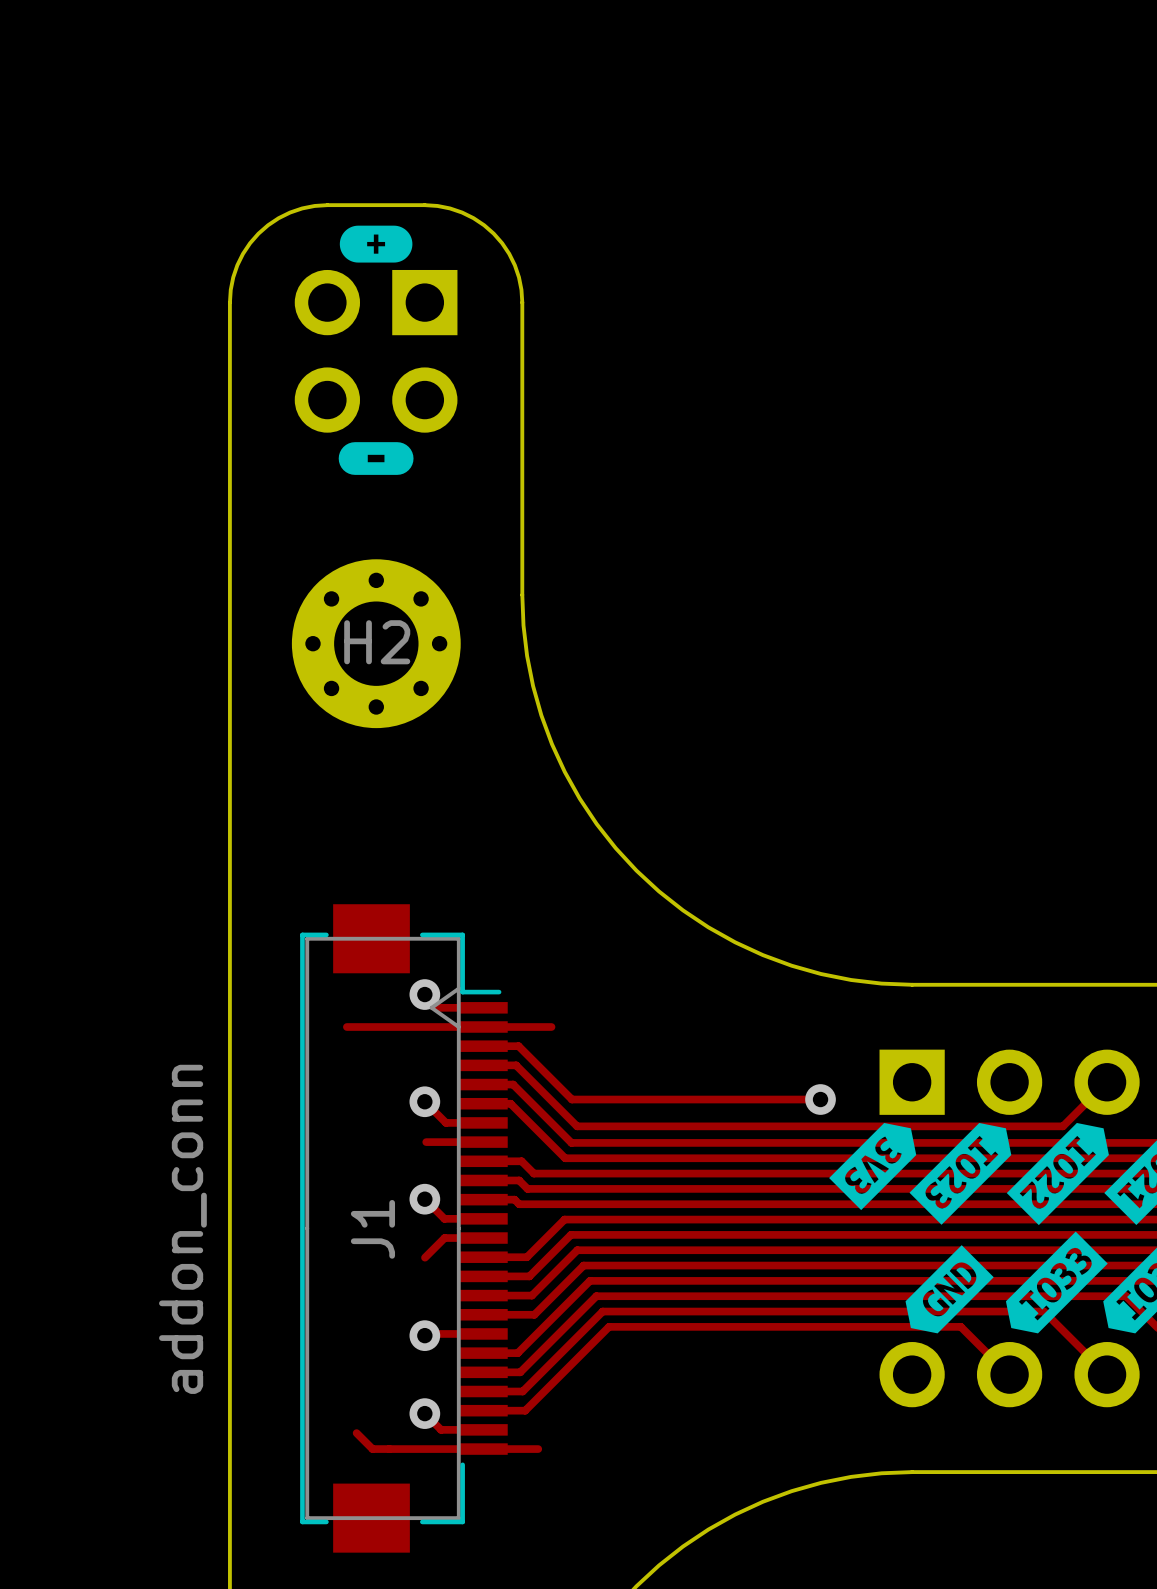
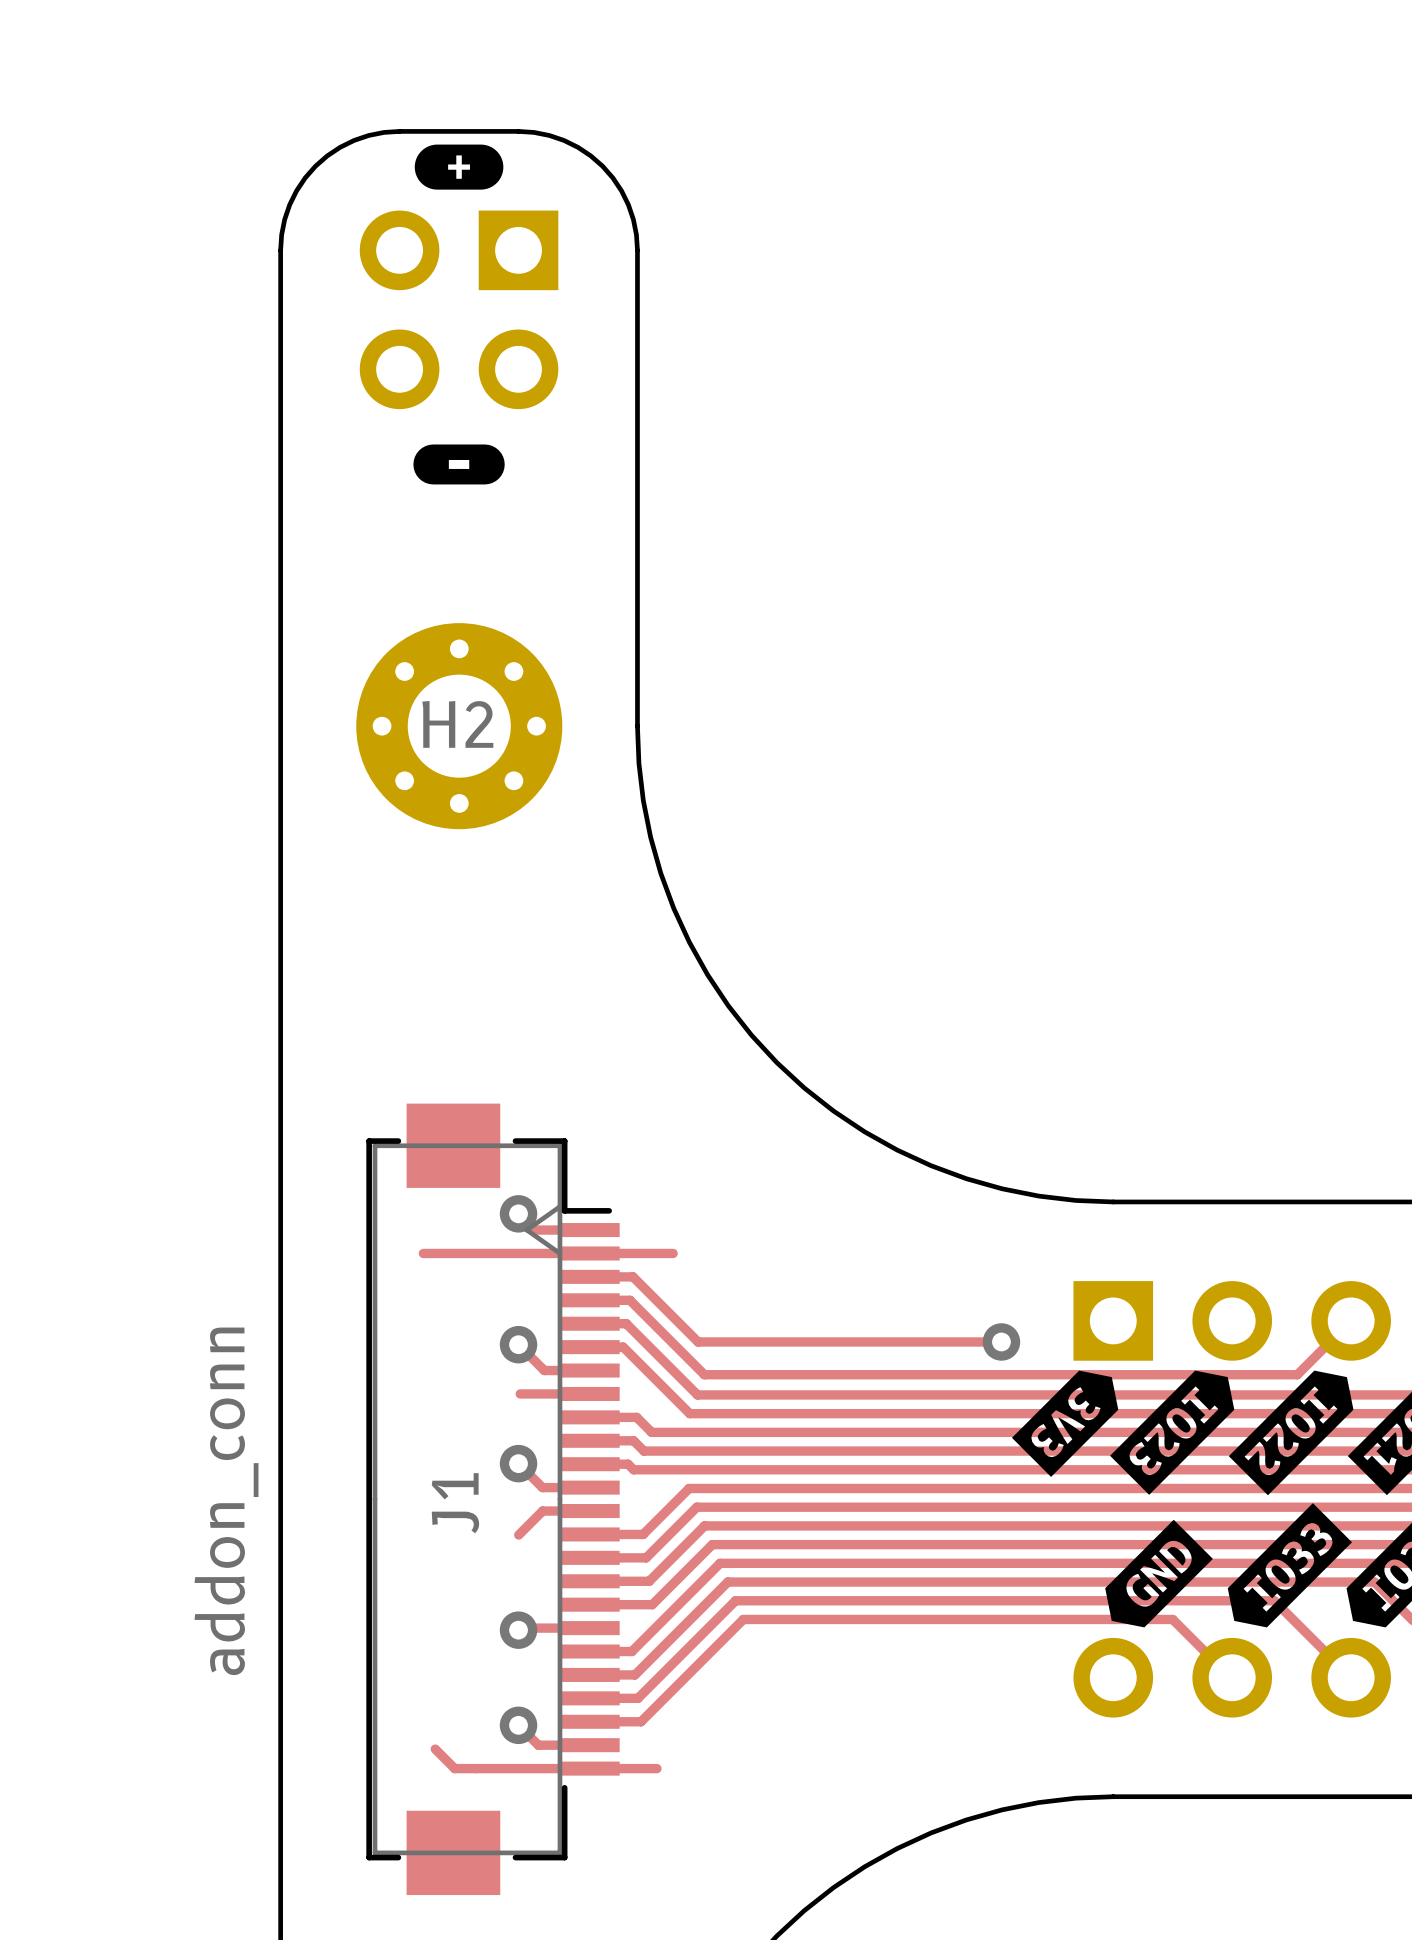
drawing position: (376, 244) -> (459, 167)
board edge: (229, 302) (233, 277) (237, 265) (250, 243) (258, 233) (268, 225) (290, 212) (302, 208) (327, 205) (437, 205) (450, 208) (473, 218) (493, 233) (509, 253) (518, 277) (522, 302) -> (280, 369) (281, 234) (284, 219) (296, 190) (315, 166) (340, 147) (368, 135) (399, 131) (534, 132) (549, 135) (578, 147) (602, 166) (621, 190) (628, 204) (636, 234) (637, 369)
part position: (376, 351) -> (459, 309)
drawing position: (376, 458) -> (459, 464)
H2 position: (376, 643) -> (459, 726)

